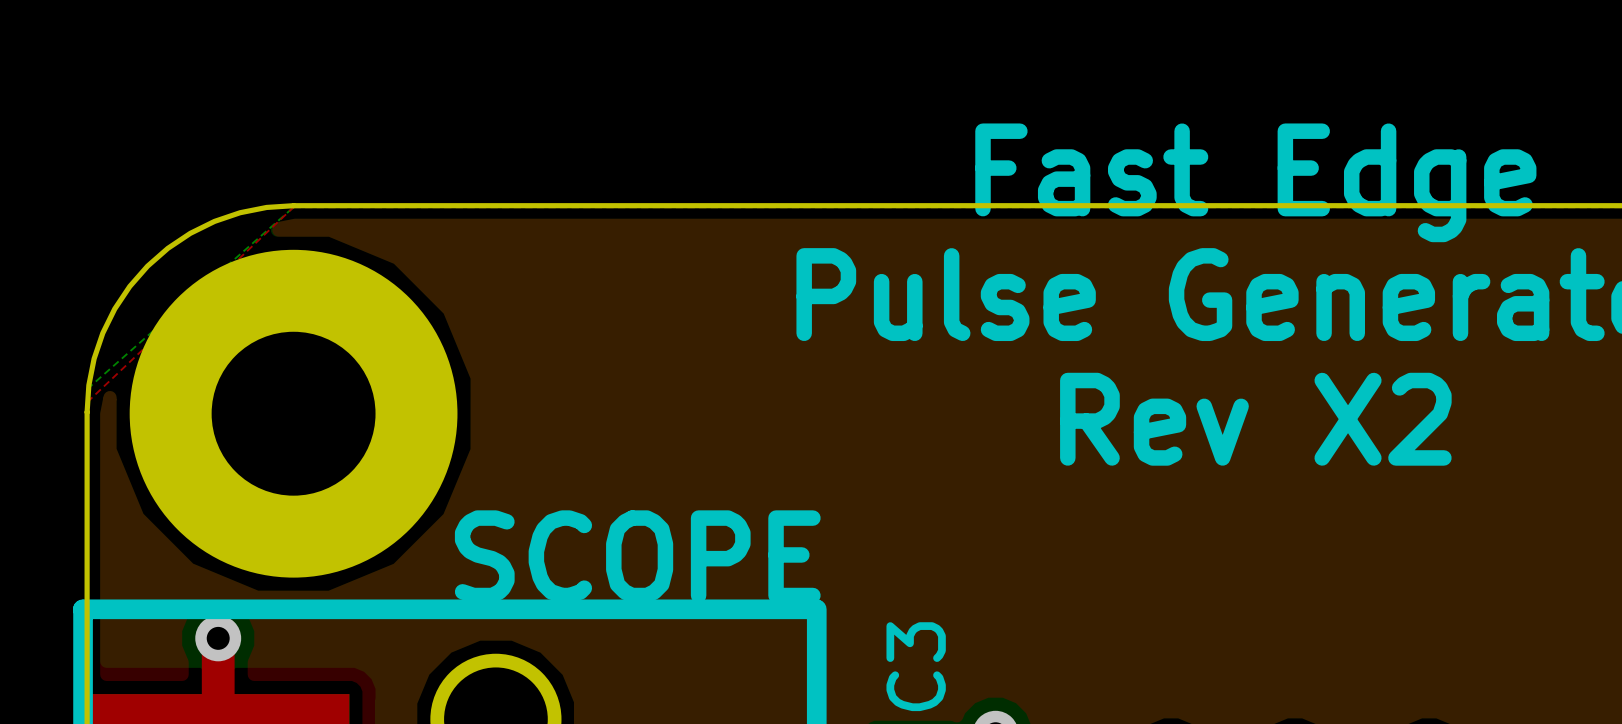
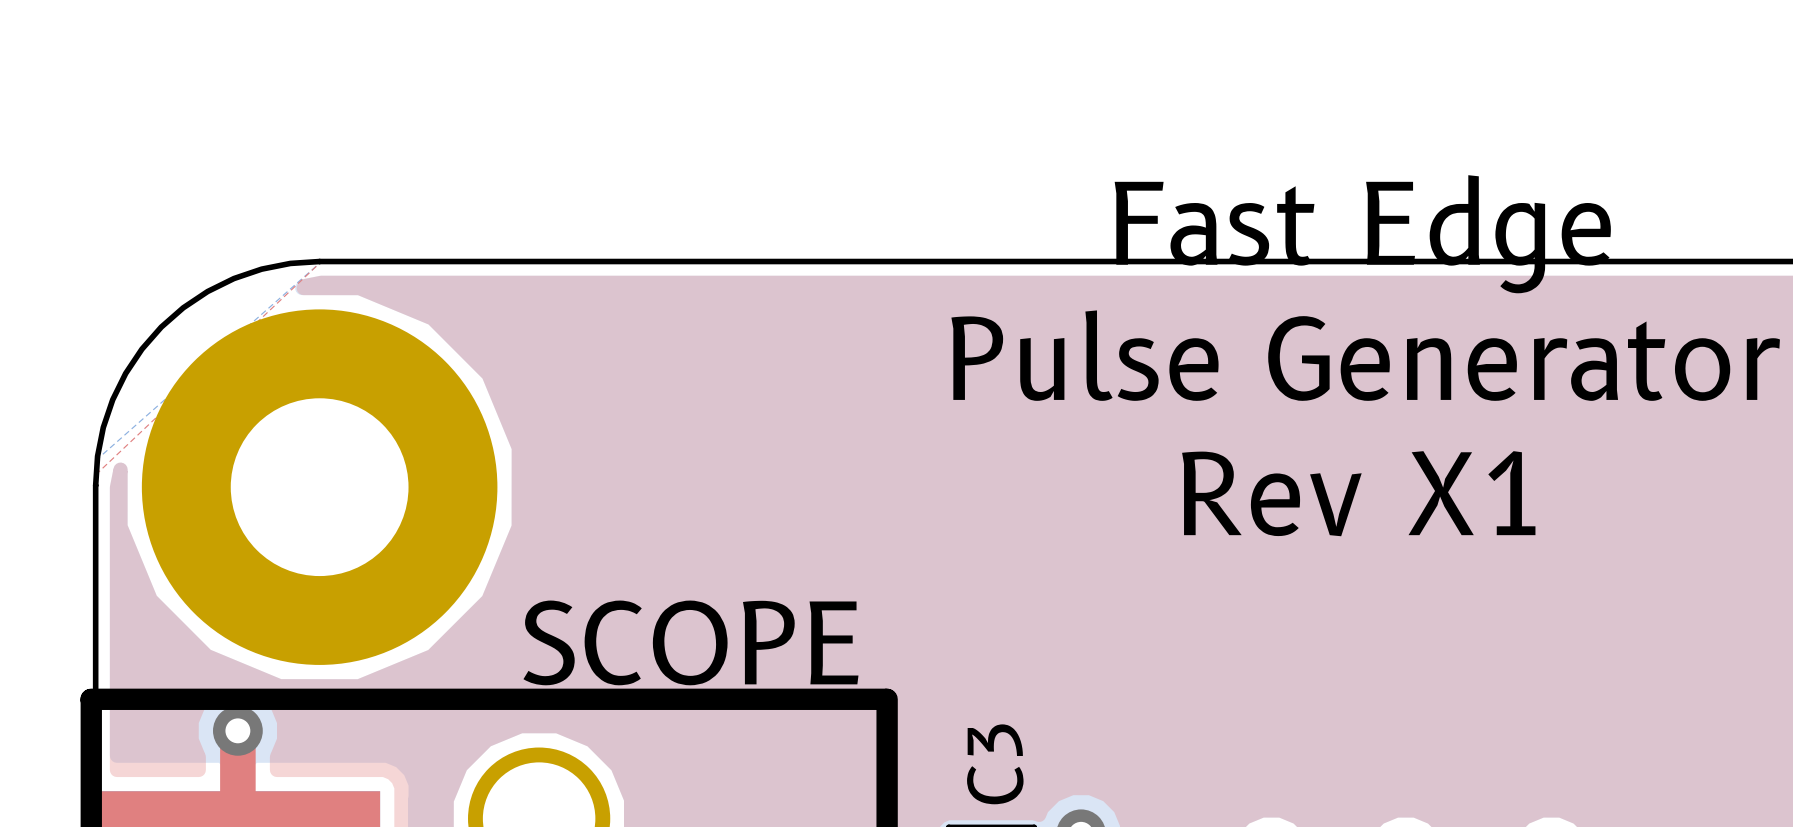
text: Rev X2 (1255, 419) -> Rev X1 (1358, 493)

